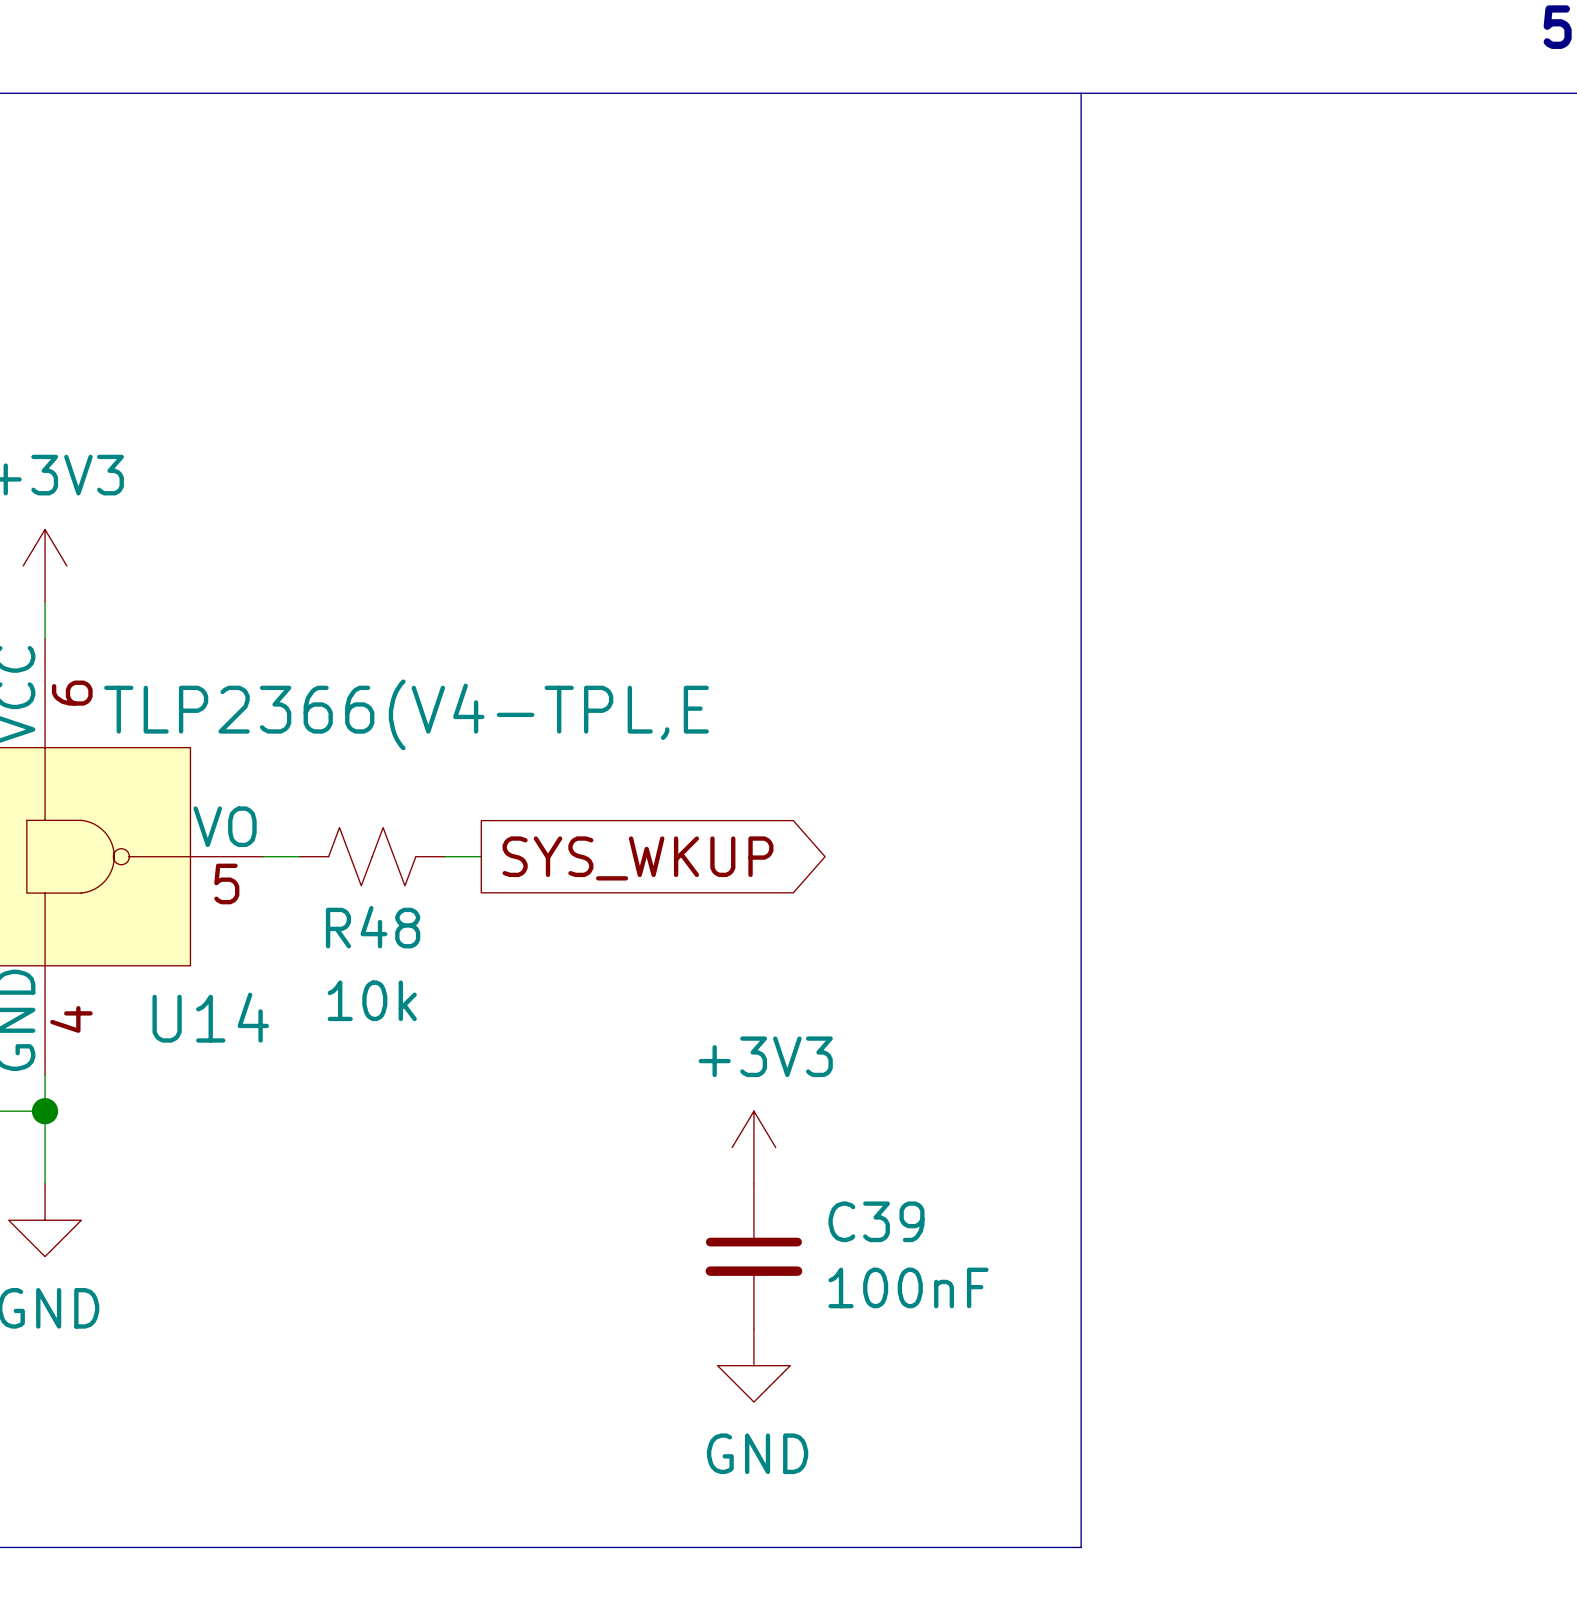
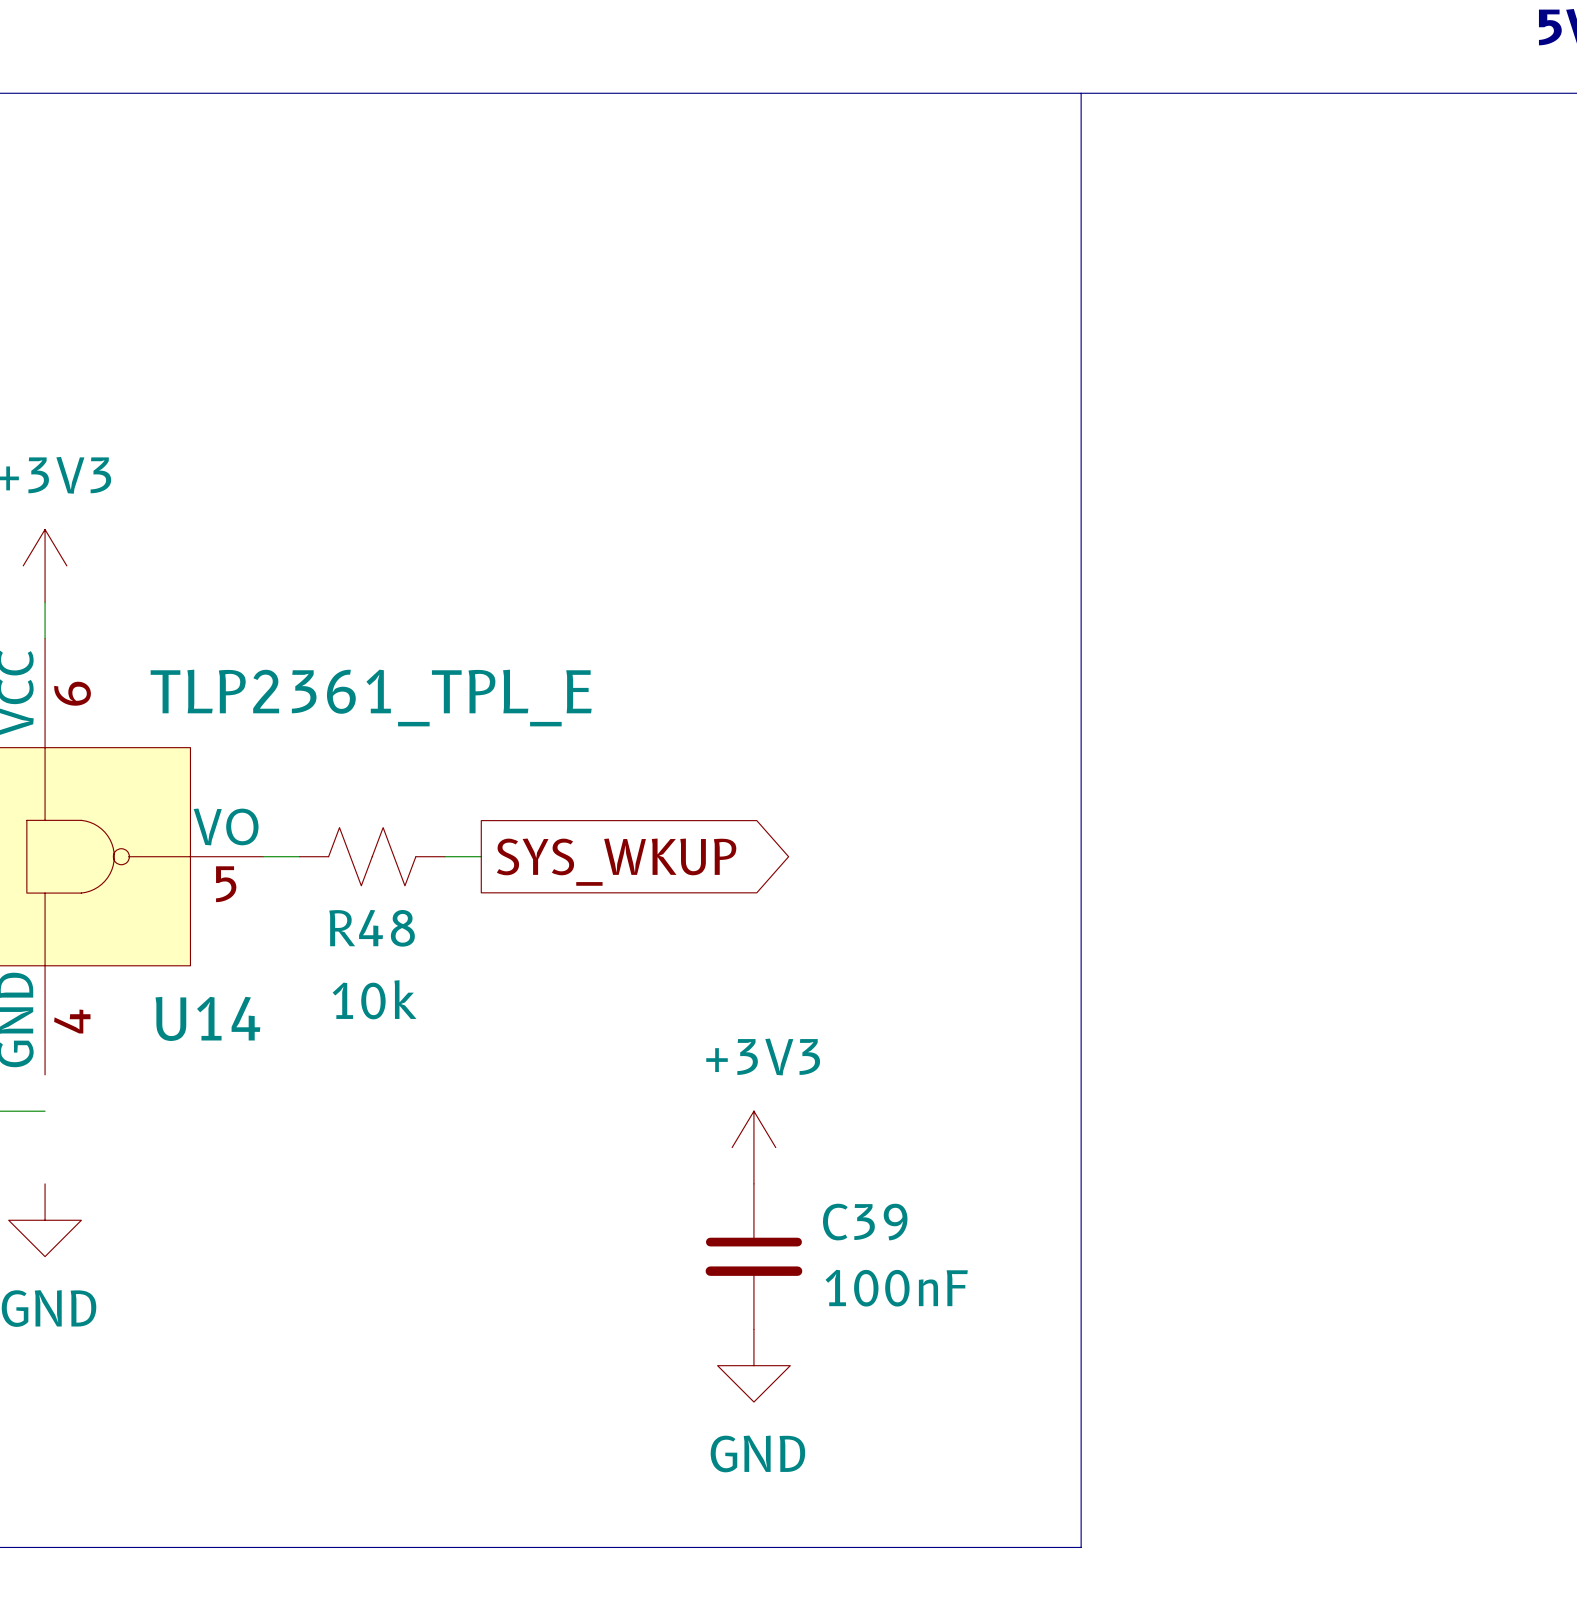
U14 value: TLP2366(V4-TPL,E (406, 714) -> TLP2361_TPL_E (371, 698)
wire: (45, 1074) (45, 1183) -> none
junction: (45, 1111) -> none

